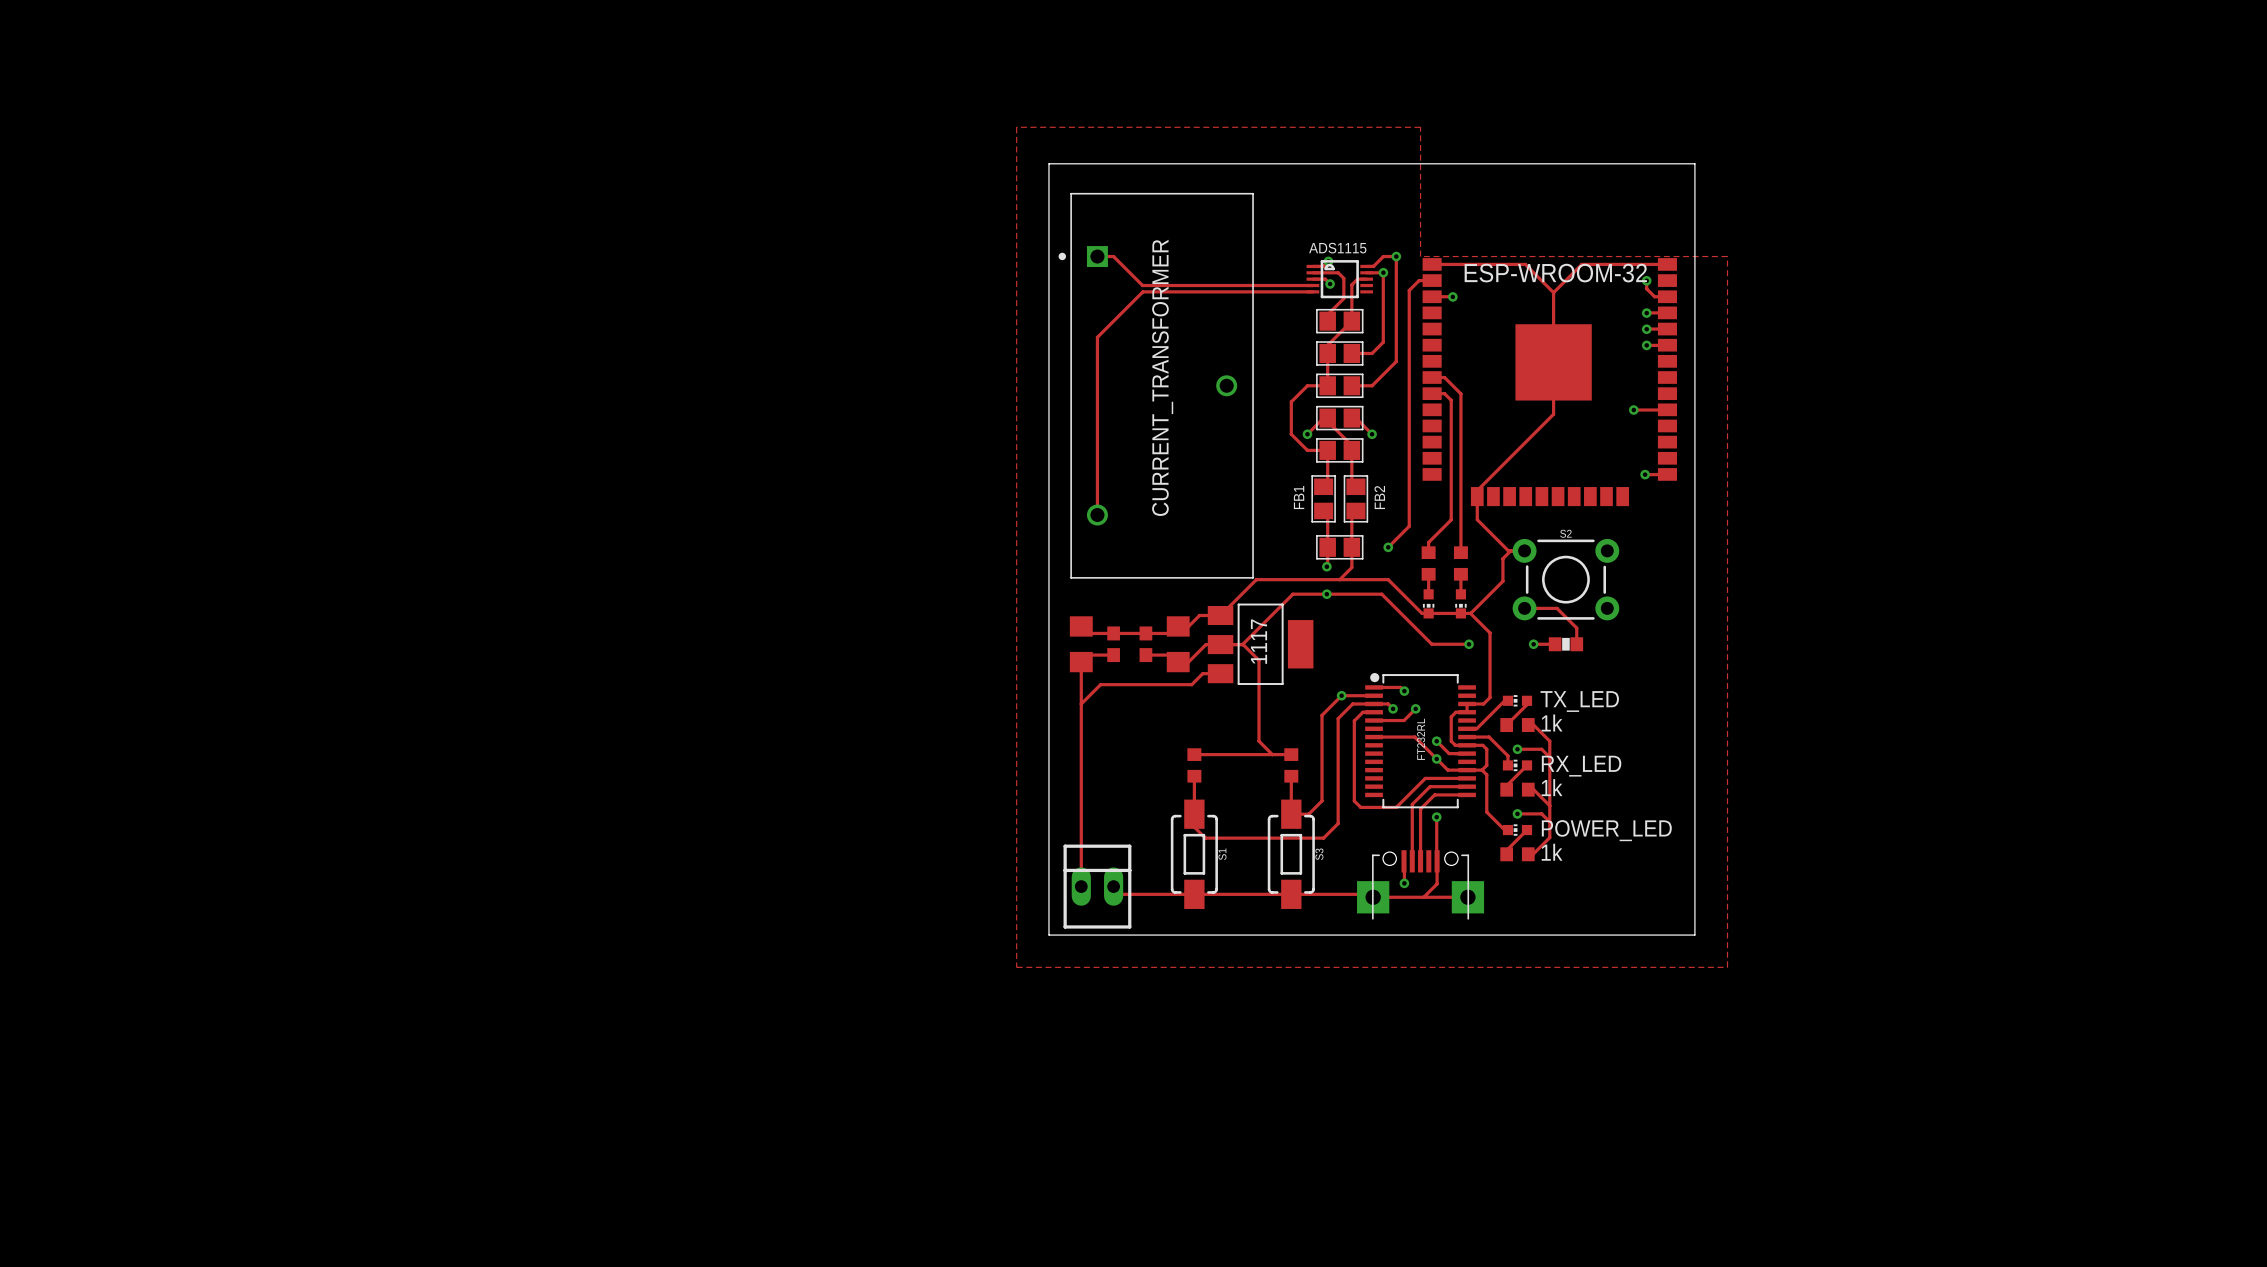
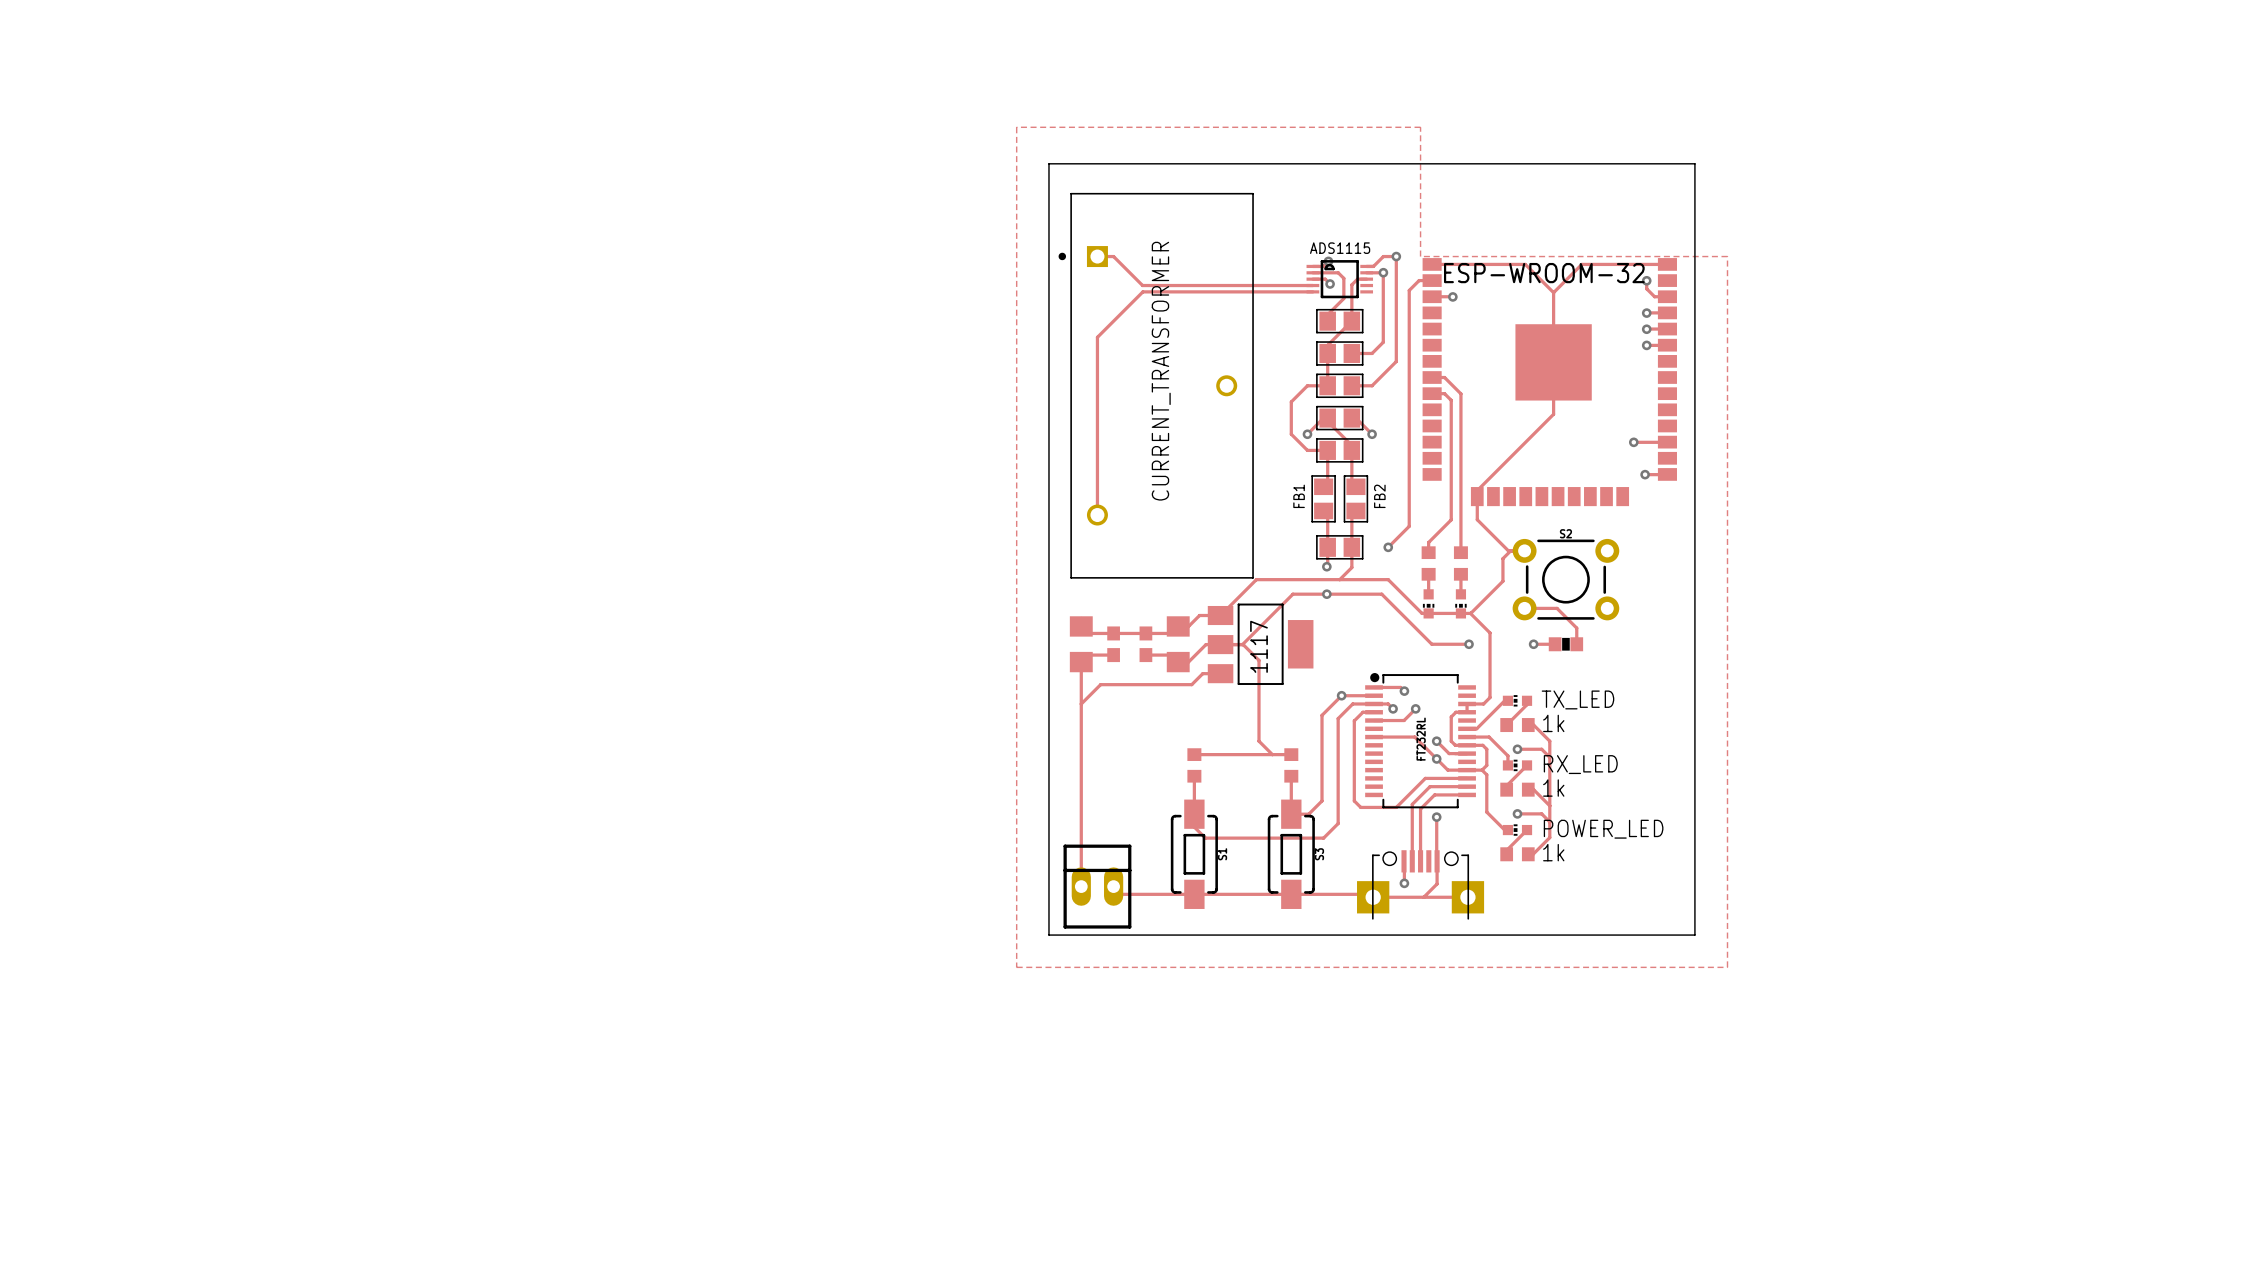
track: (1667, 409) (1633, 410) -> (1667, 442) (1633, 442)
via position: (1633, 410) -> (1633, 442)

